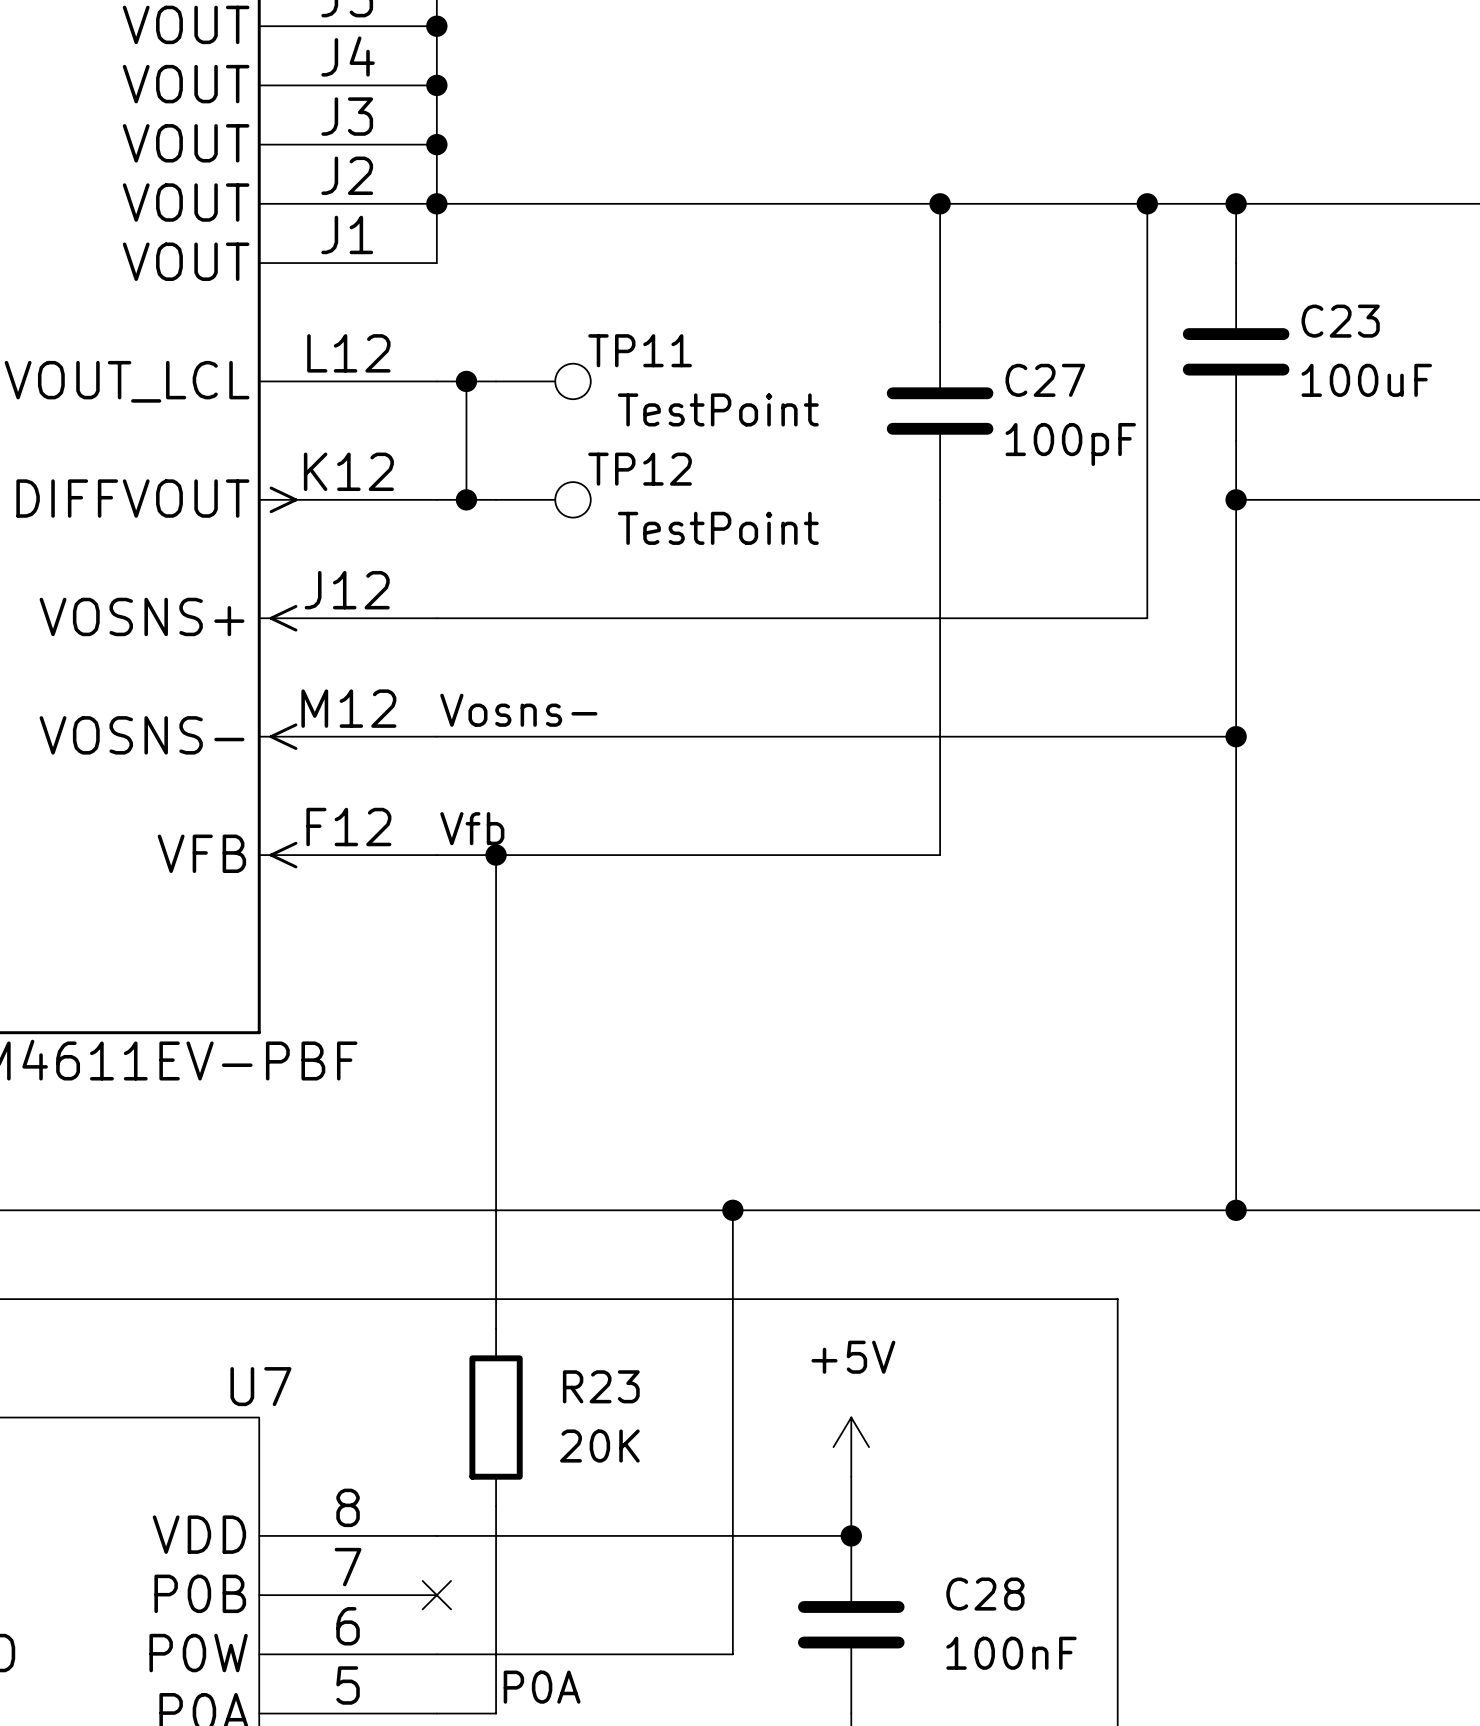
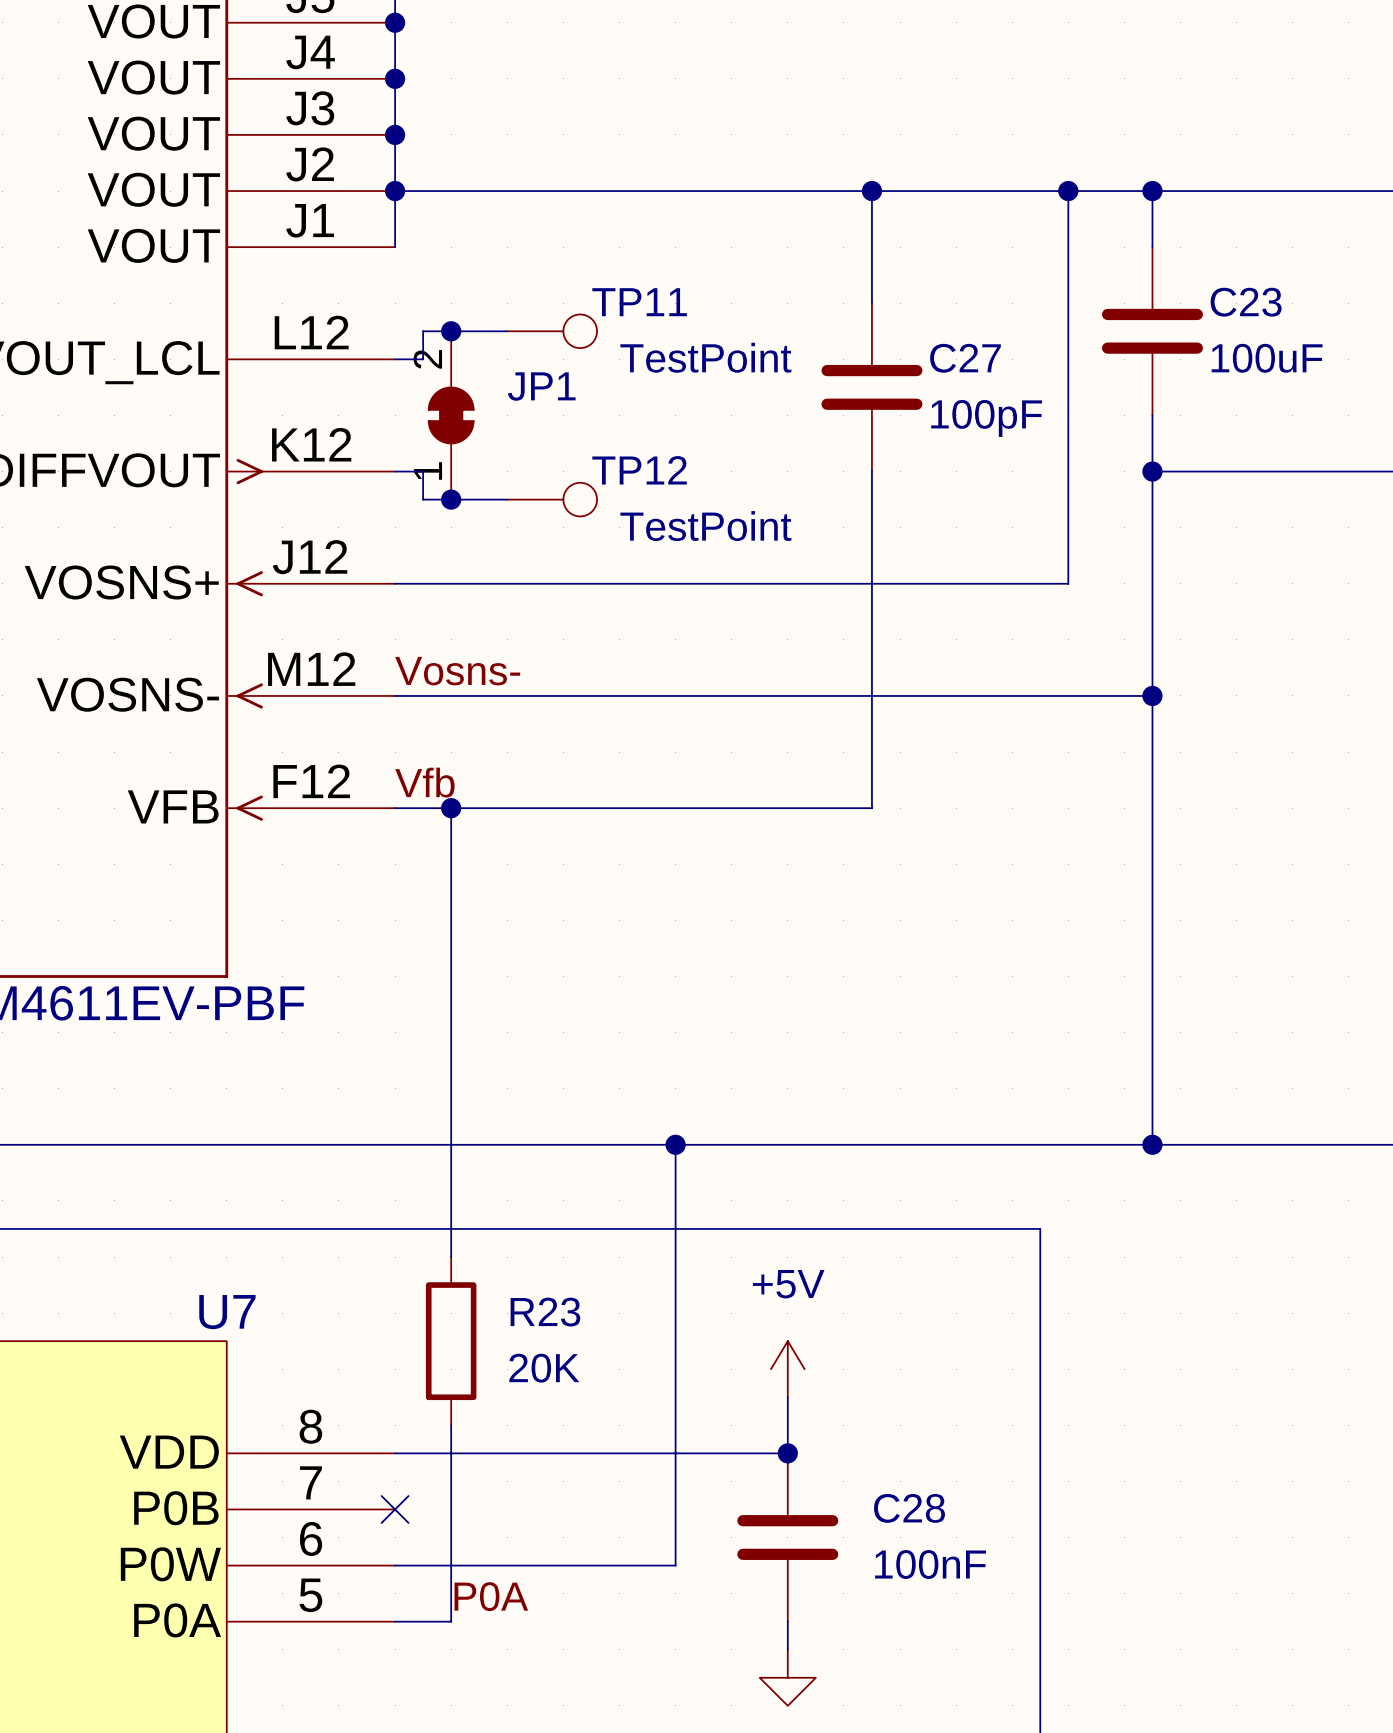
wire: none -> (507, 331) (423, 331) (423, 359)
junction position: (466, 381) -> (451, 331)
wire: (496, 381) (466, 381) (466, 499) (496, 499) -> none
TP11 position: (543, 381) -> (552, 331)
JP1: none -> (451, 415)
wire: none -> (423, 471) (423, 499) (507, 499)
junction position: (466, 499) -> (451, 499)
TP12 position: (543, 499) -> (552, 499)

